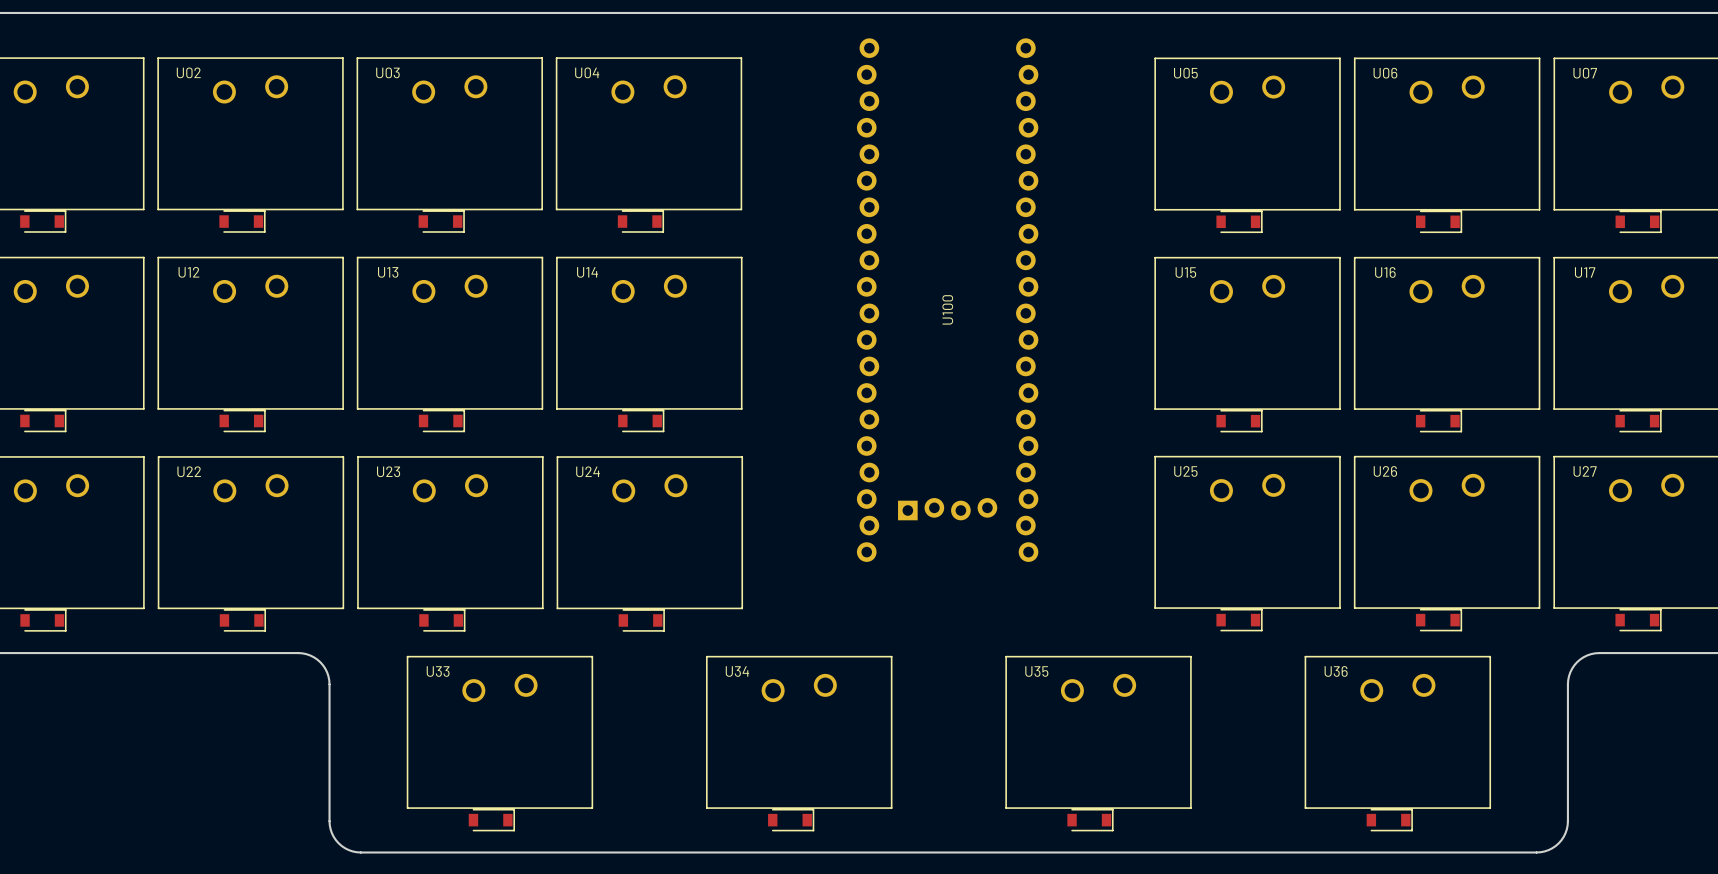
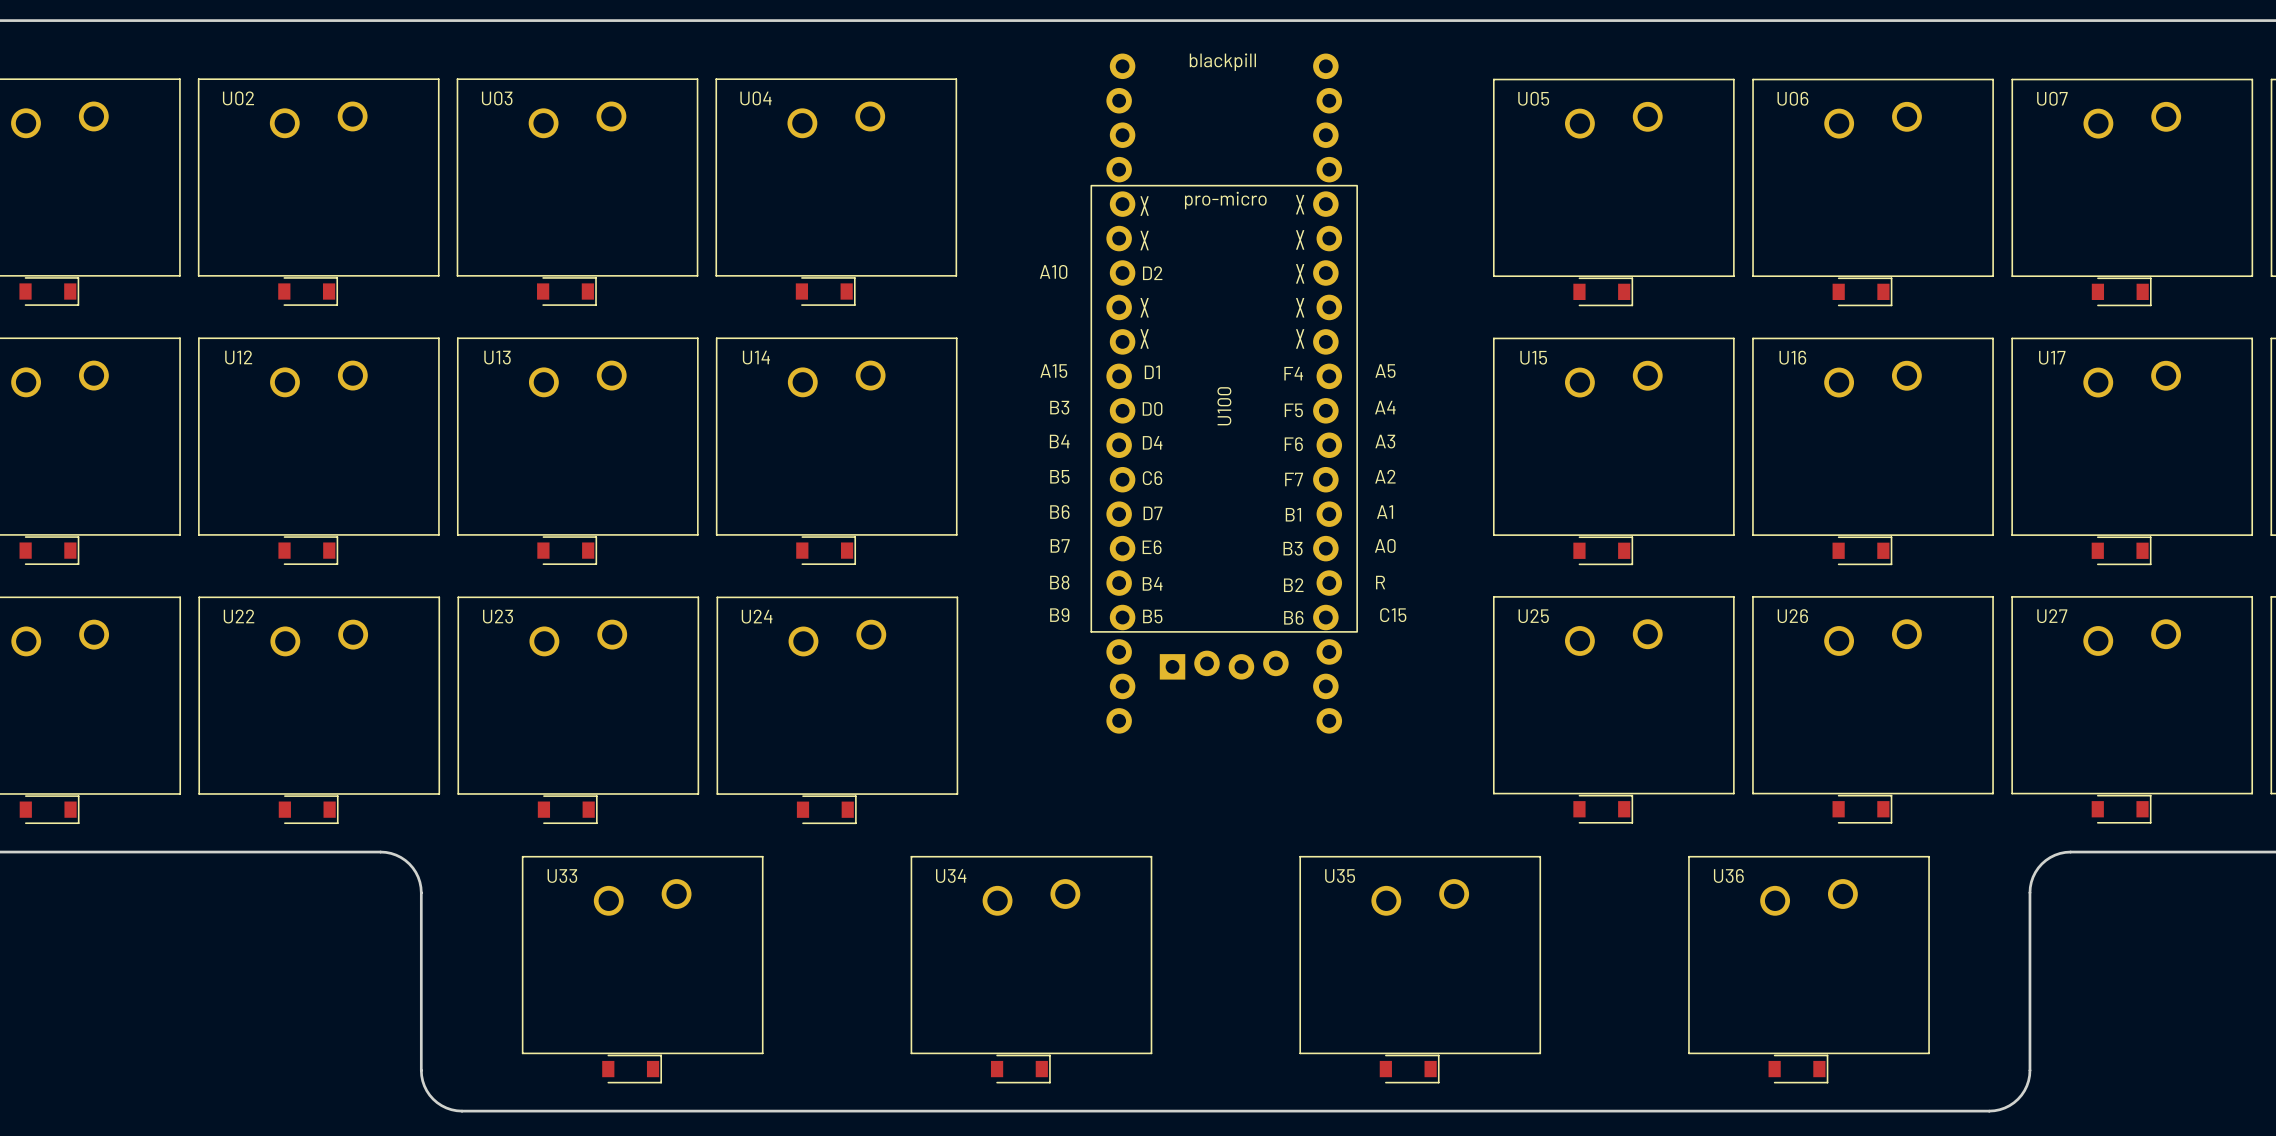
U100 footprint: [856, 38, 1039, 562] -> [1090, 53, 1358, 734]

